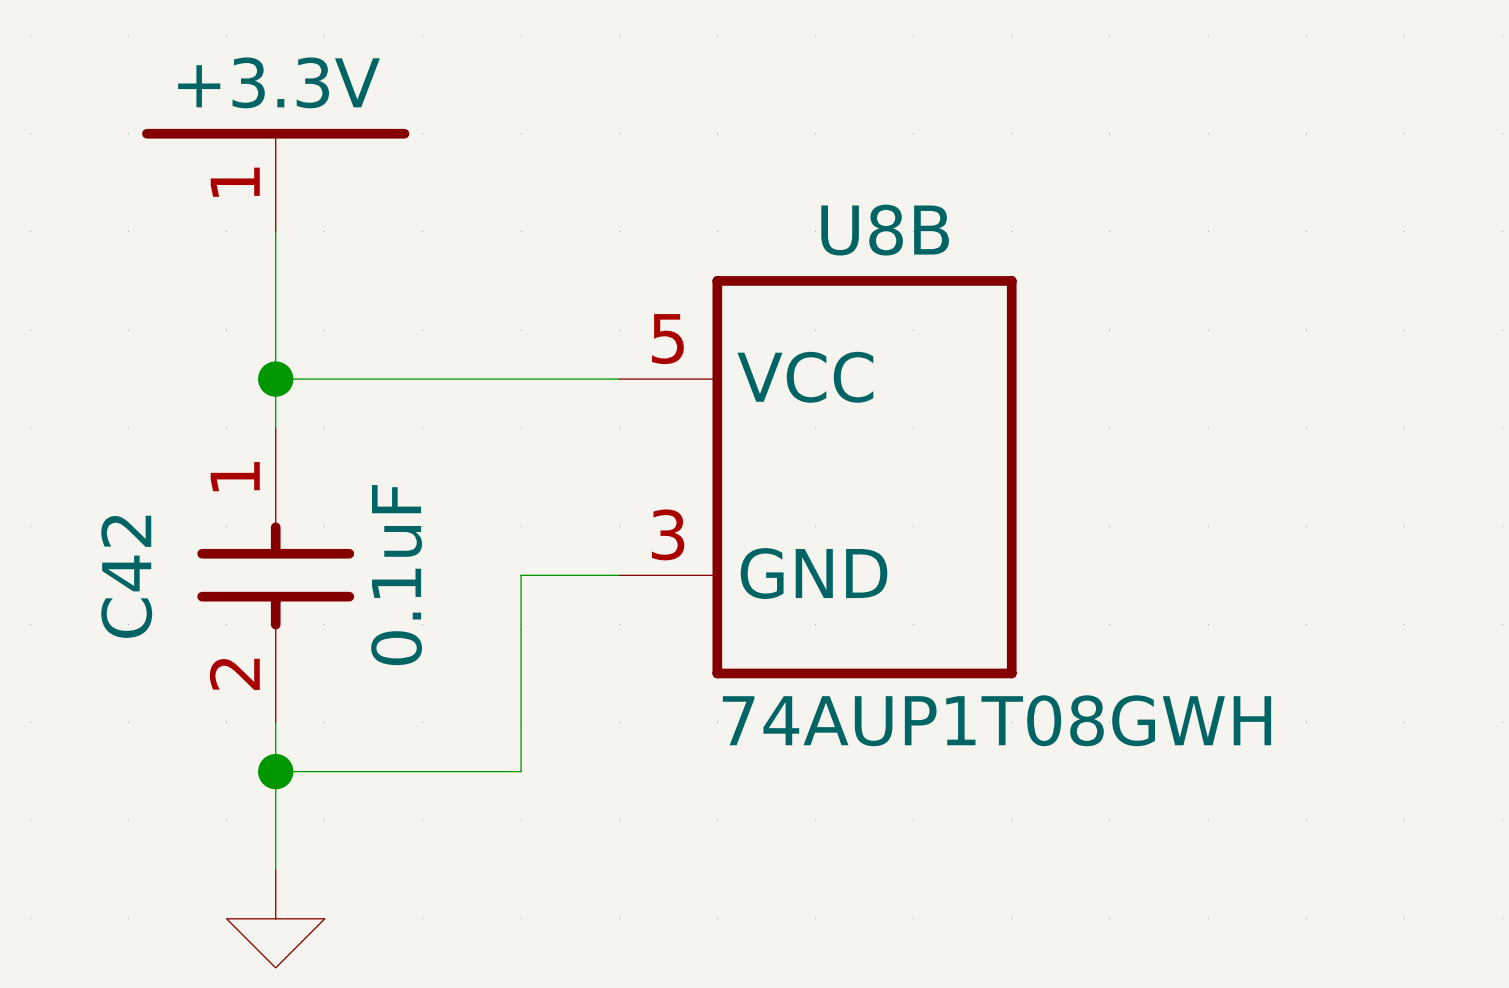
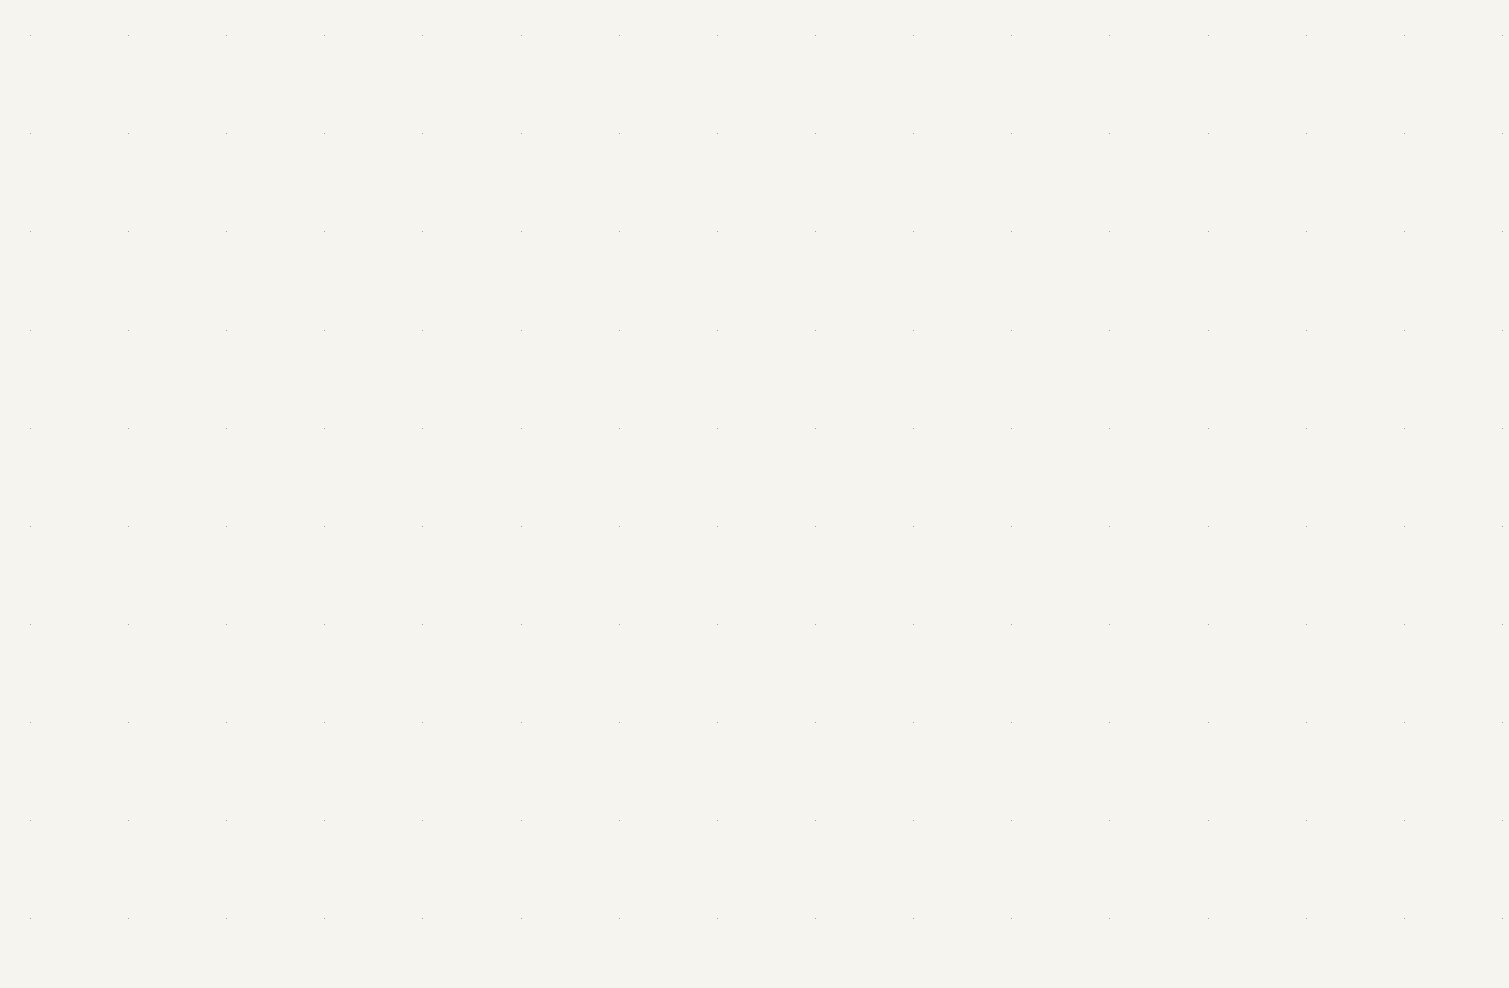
power symbol: +3.3V (275, 180) -> none
wire: (275, 231) (275, 428) -> none
wire: (275, 379) (619, 379) -> none
junction: (275, 379) -> none
U8B: (817, 477) -> none
C42: 0.1uF (275, 575) -> none
wire: (619, 575) (521, 575) (521, 771) (275, 771) -> none
wire: (275, 722) (275, 869) -> none
junction: (275, 771) -> none
power symbol: (275, 918) -> none

